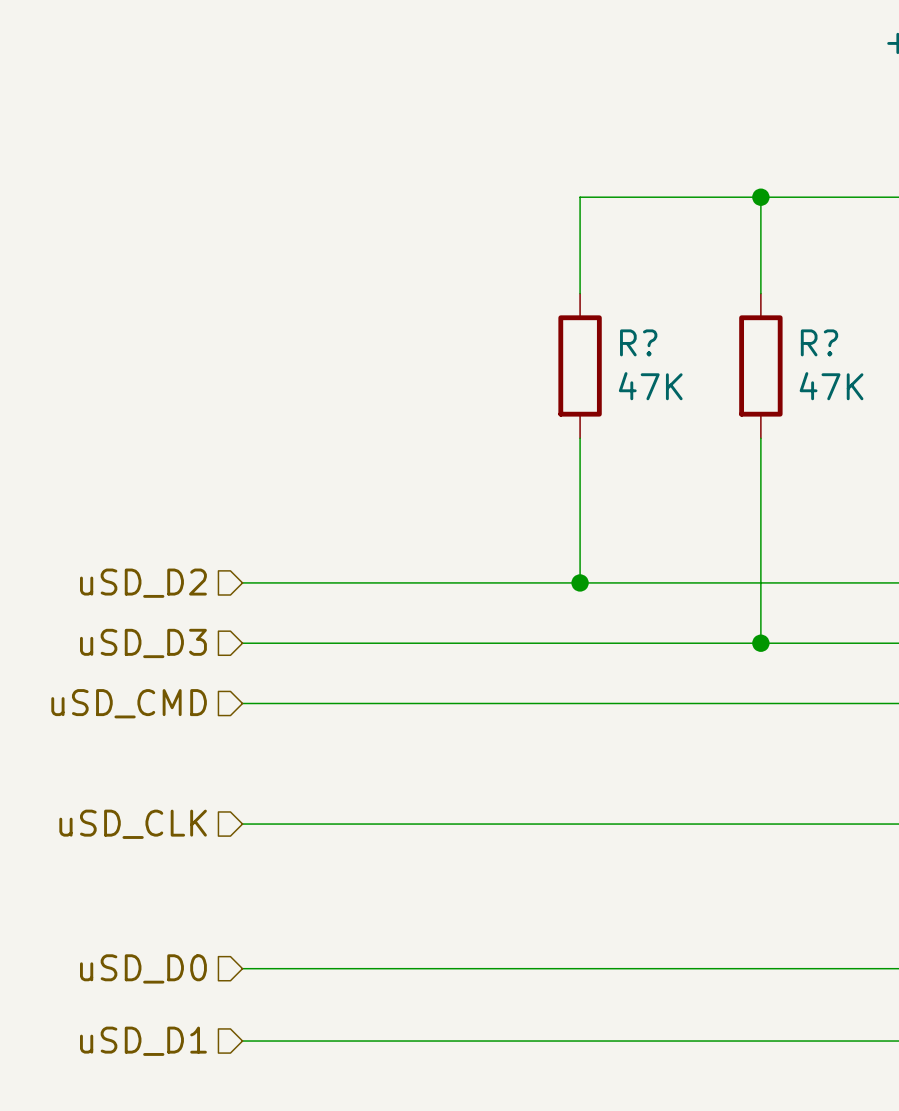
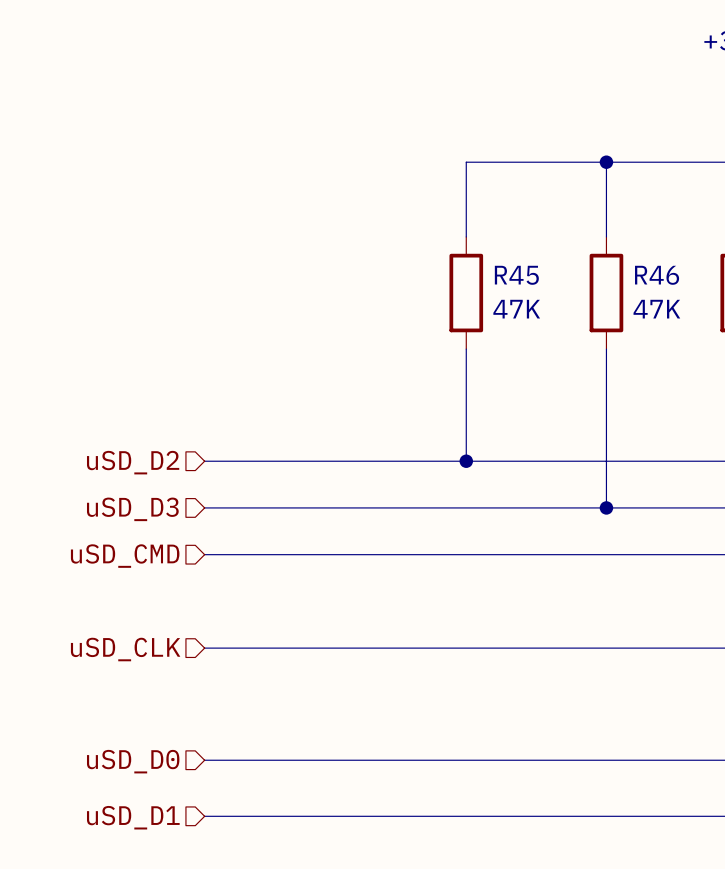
R? name: R? (638, 342) -> R45 (516, 275)
R? name: R? (819, 342) -> R46 (657, 275)

